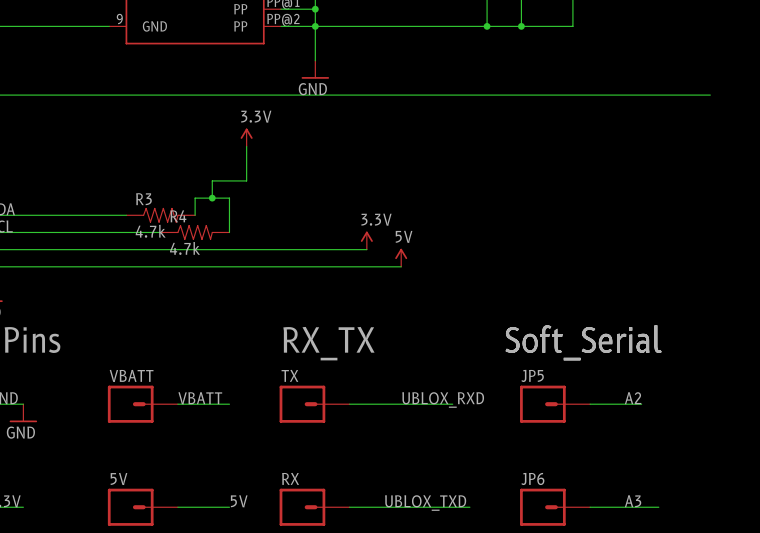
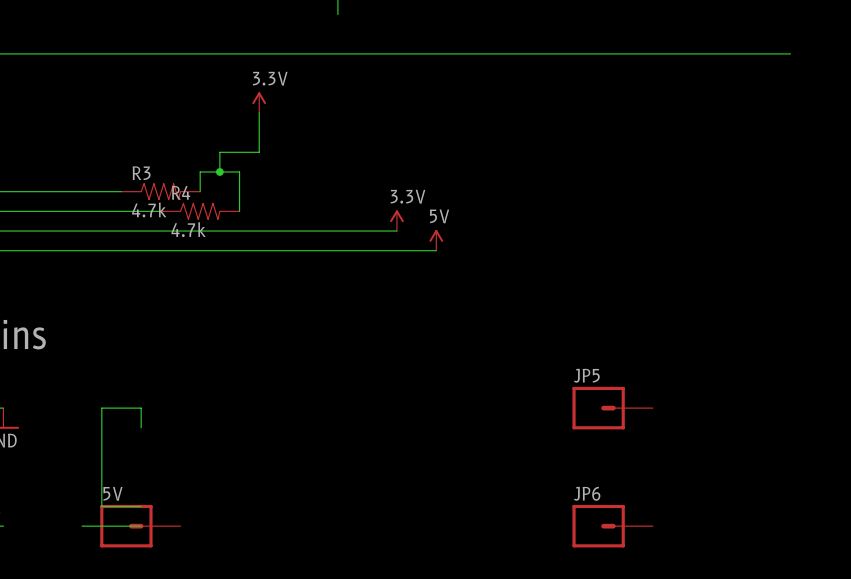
power symbol: GND (315, 69) -> none
text: Soft_Serial (583, 342) -> none
text: RX_TX (328, 343) -> none
label: VBATT (200, 398) -> none
label: A2 (633, 398) -> none
label: UBLOX_RXD (443, 399) -> none
VBATT: (142, 404) -> none
wire: (177, 404) (229, 404) -> none
TX: (314, 404) -> none
wire: (349, 404) (452, 404) -> none
wire: (590, 404) (641, 404) -> none
wire: none -> (141, 427) (141, 408) (101, 408) (101, 506) (141, 506)
label: 5V (239, 501) -> none
label: A3 (633, 501) -> none
label: UBLOX_TXD (425, 503) -> none
wire: (177, 507) (229, 507) -> (82, 526) (141, 526)
RX: (314, 507) -> none
wire: (349, 507) (469, 507) -> none
wire: (590, 507) (658, 507) -> none

